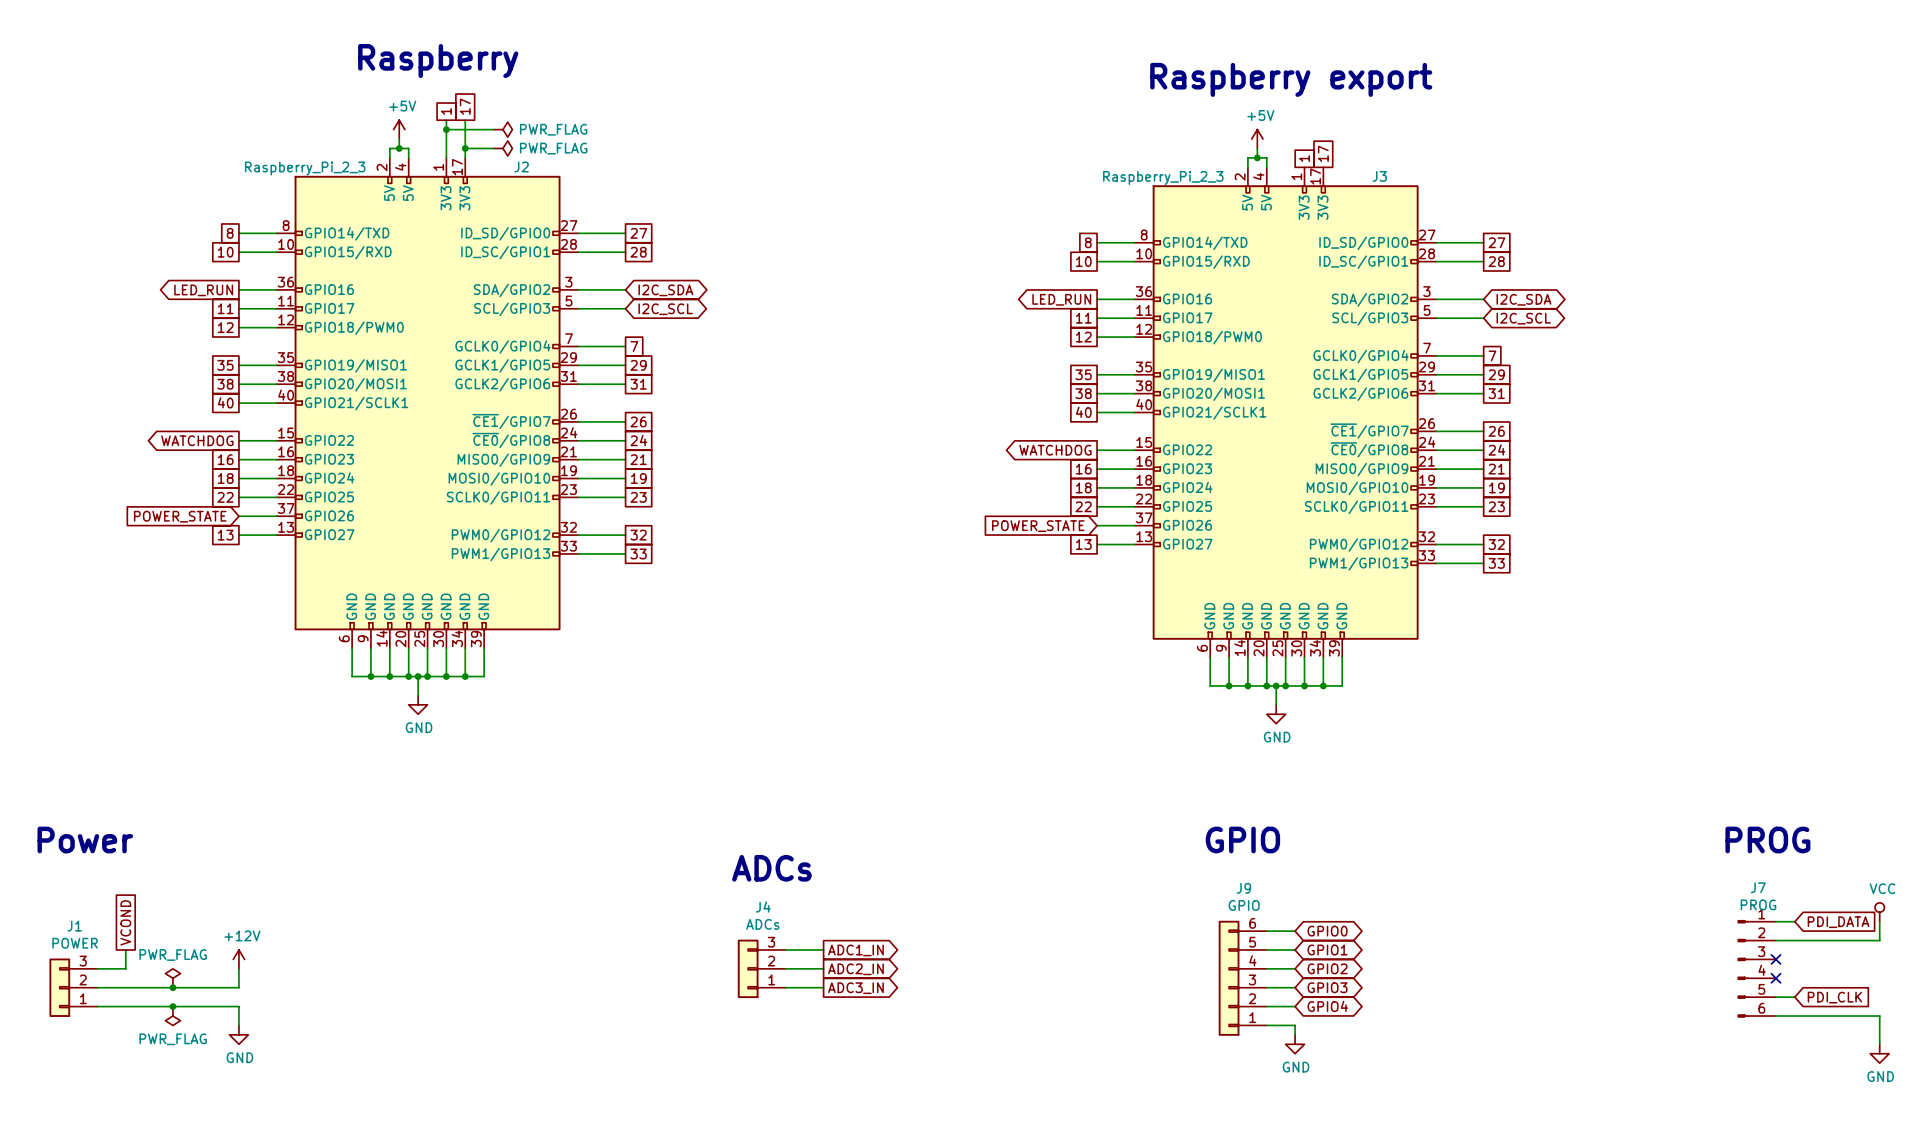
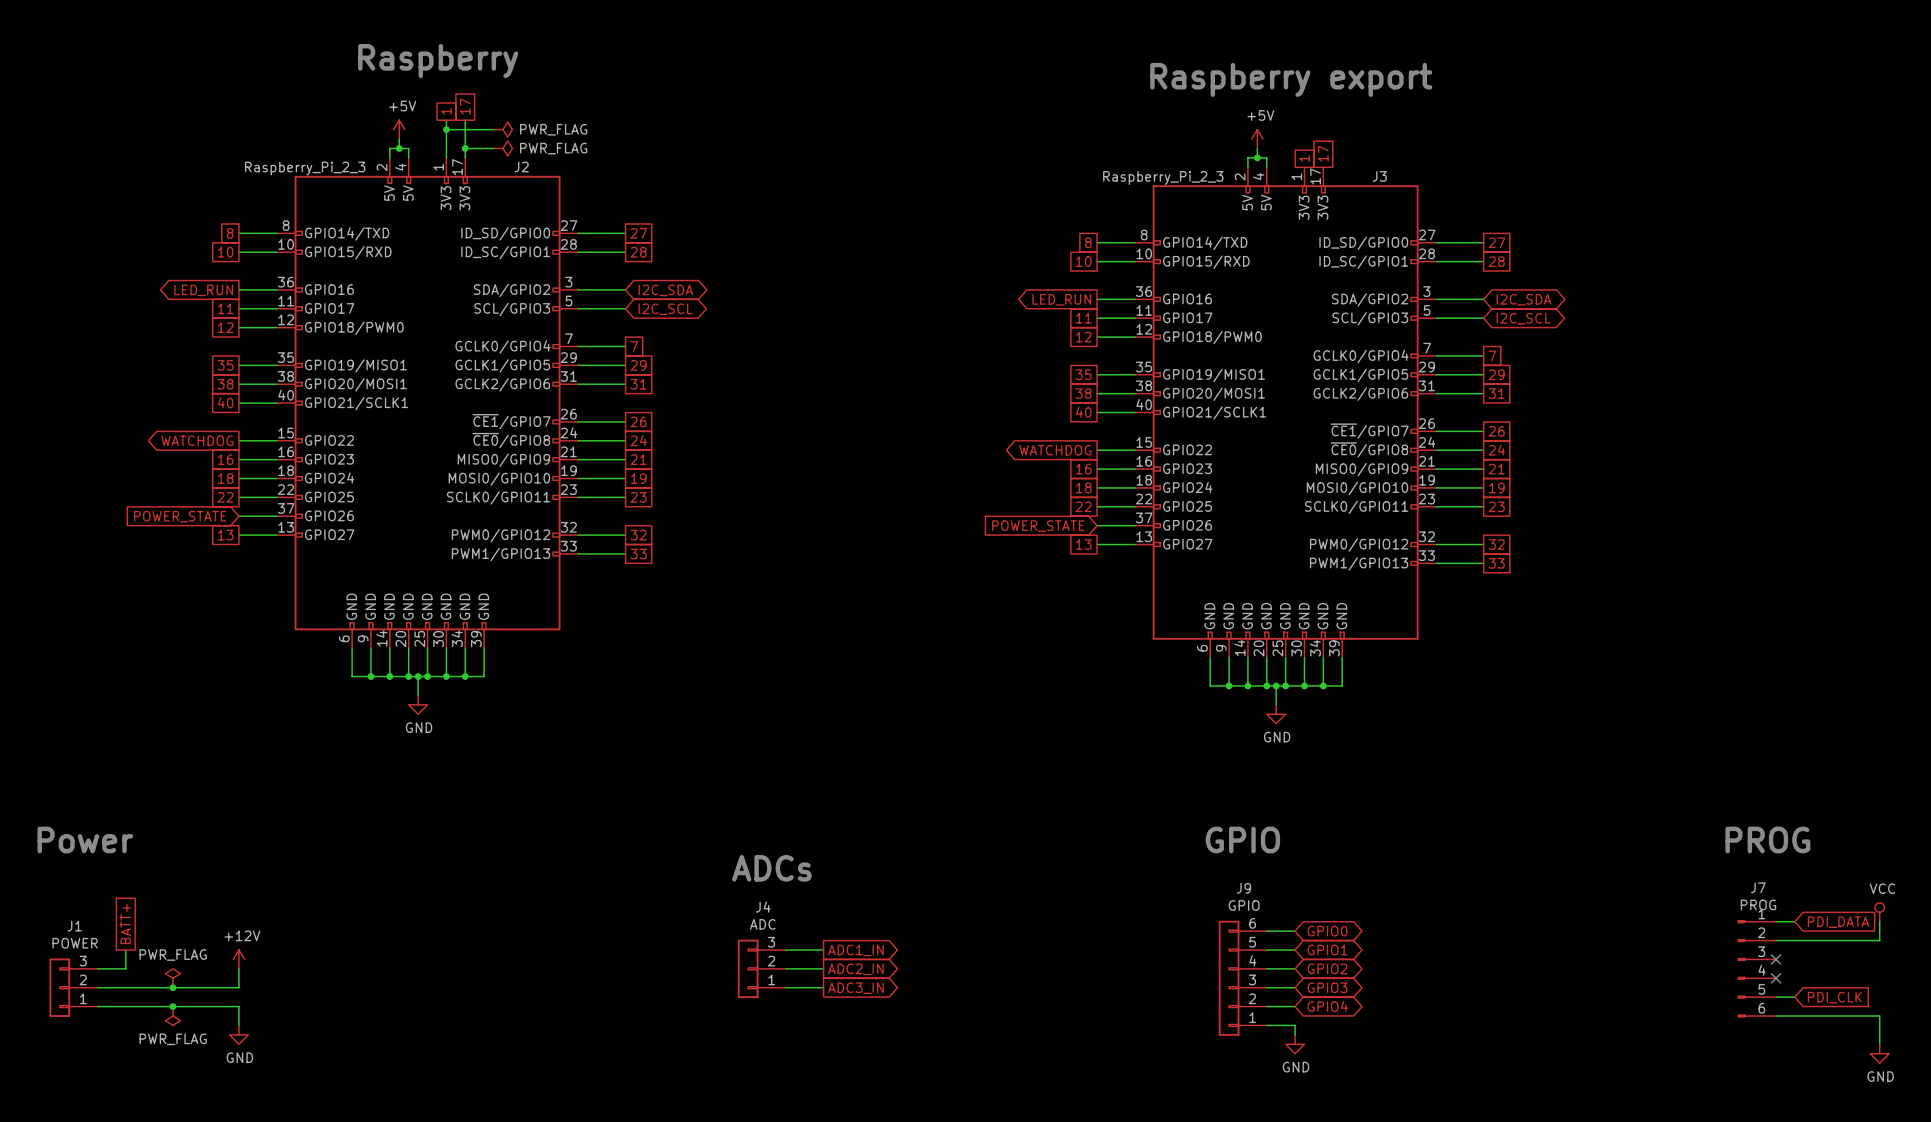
global label: VCOND (125, 922) -> BATT+ (125, 923)
J4 value: ADCs (762, 924) -> ADC (762, 924)

